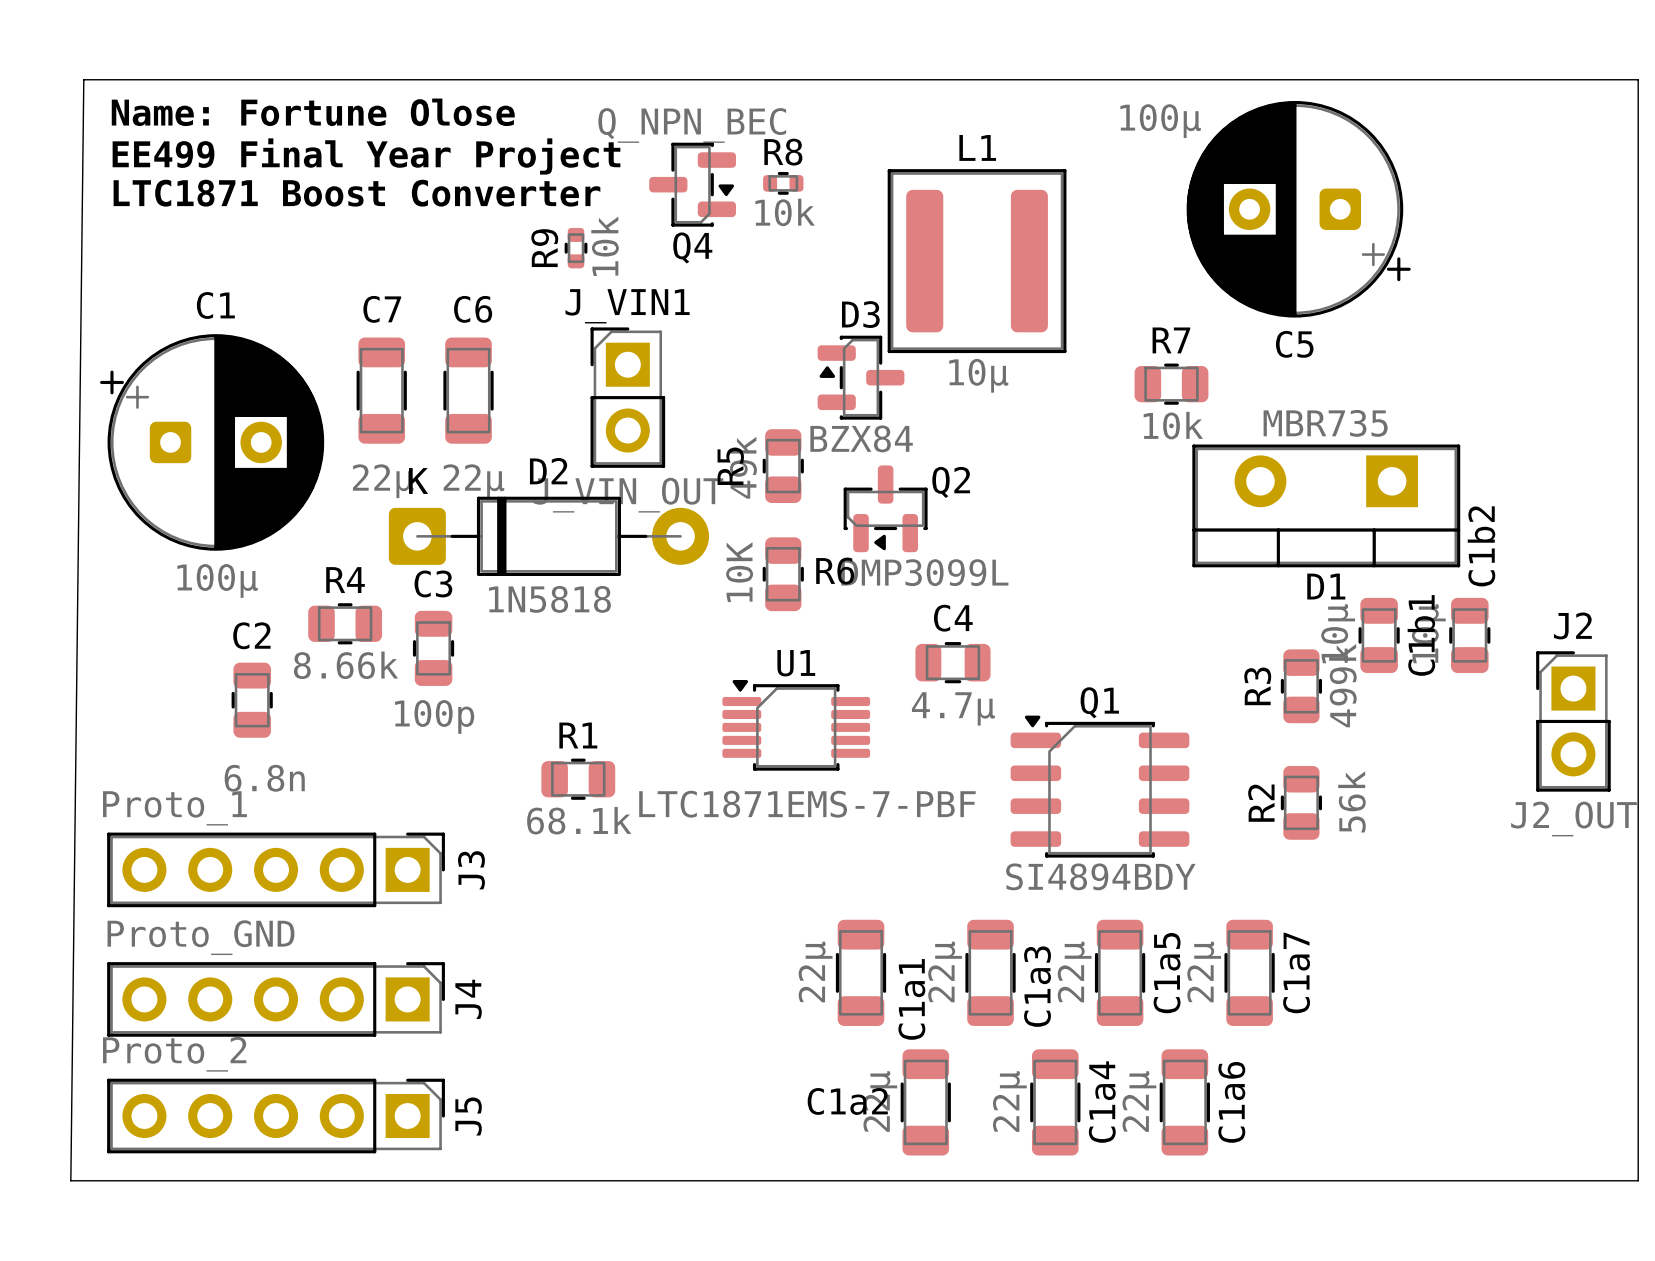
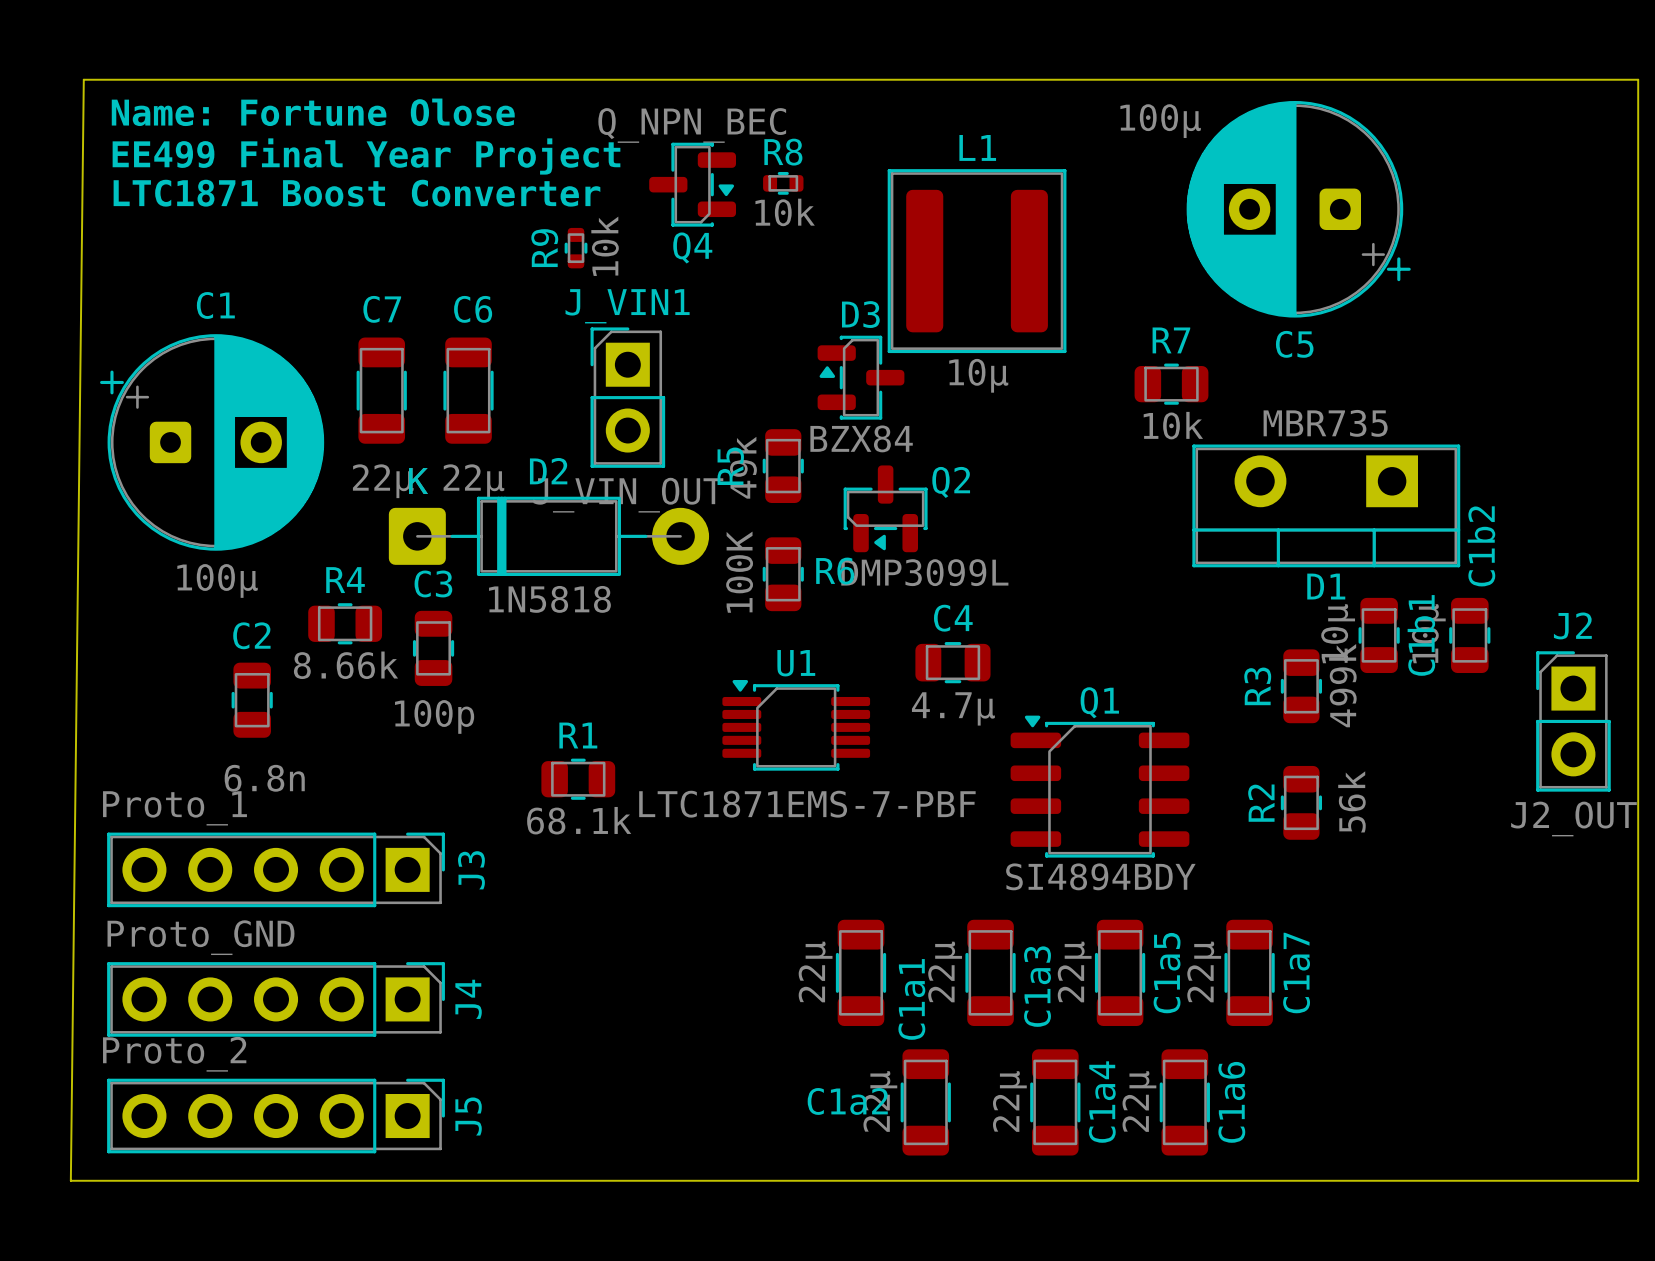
R6 value: 10K (739, 572) -> 100K (739, 572)

